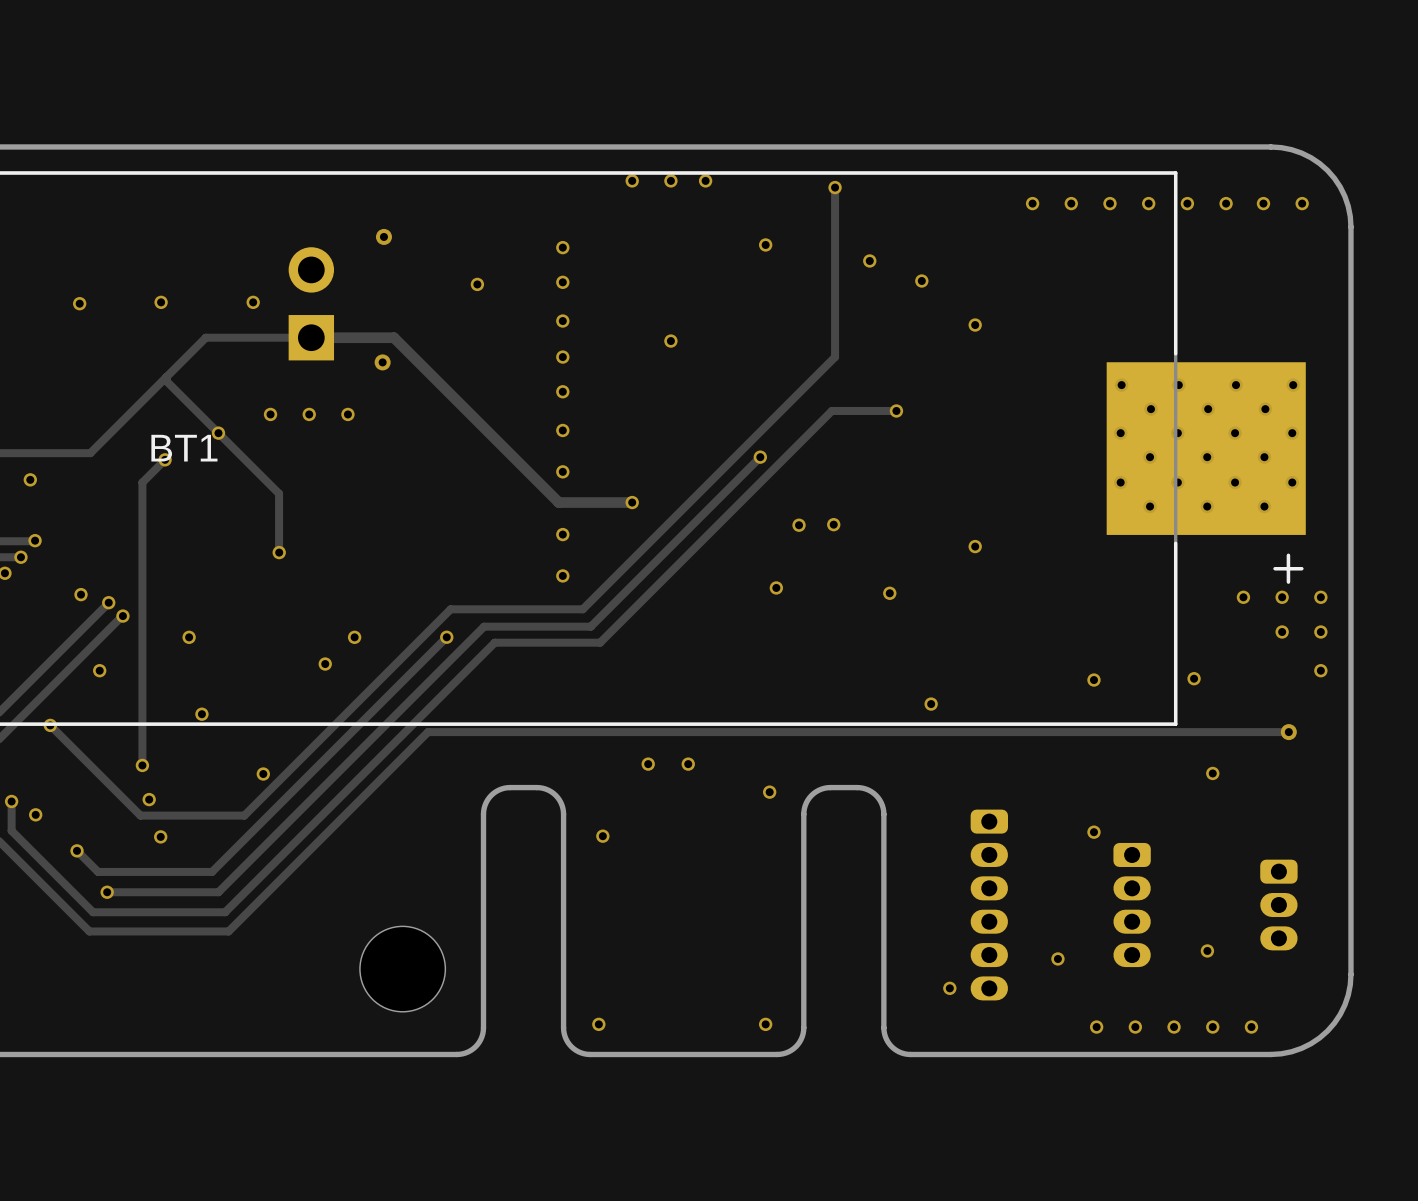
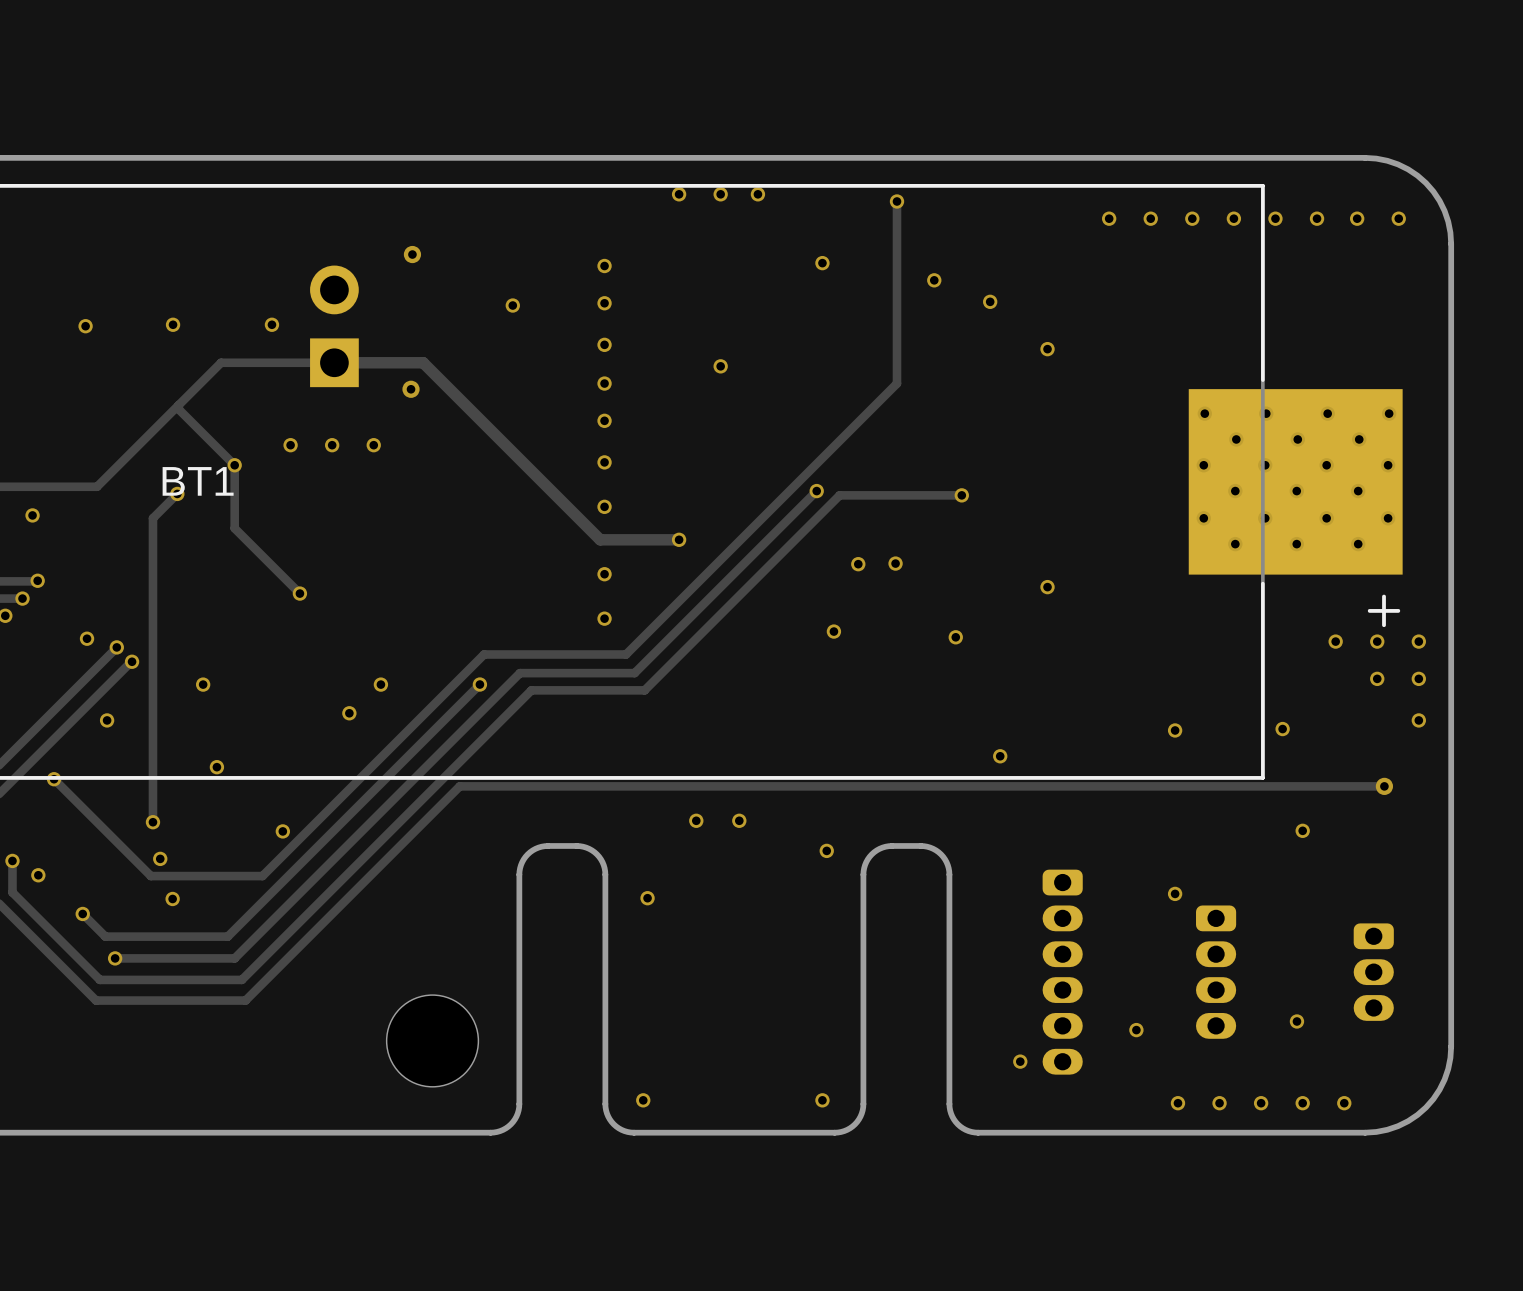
track: (896, 410) (831, 410) (781, 461) -> (961, 495) (839, 495)
via position: (896, 410) -> (961, 495)
track: (218, 433) (279, 493) (279, 552) -> (234, 465) (234, 528) (299, 593)

